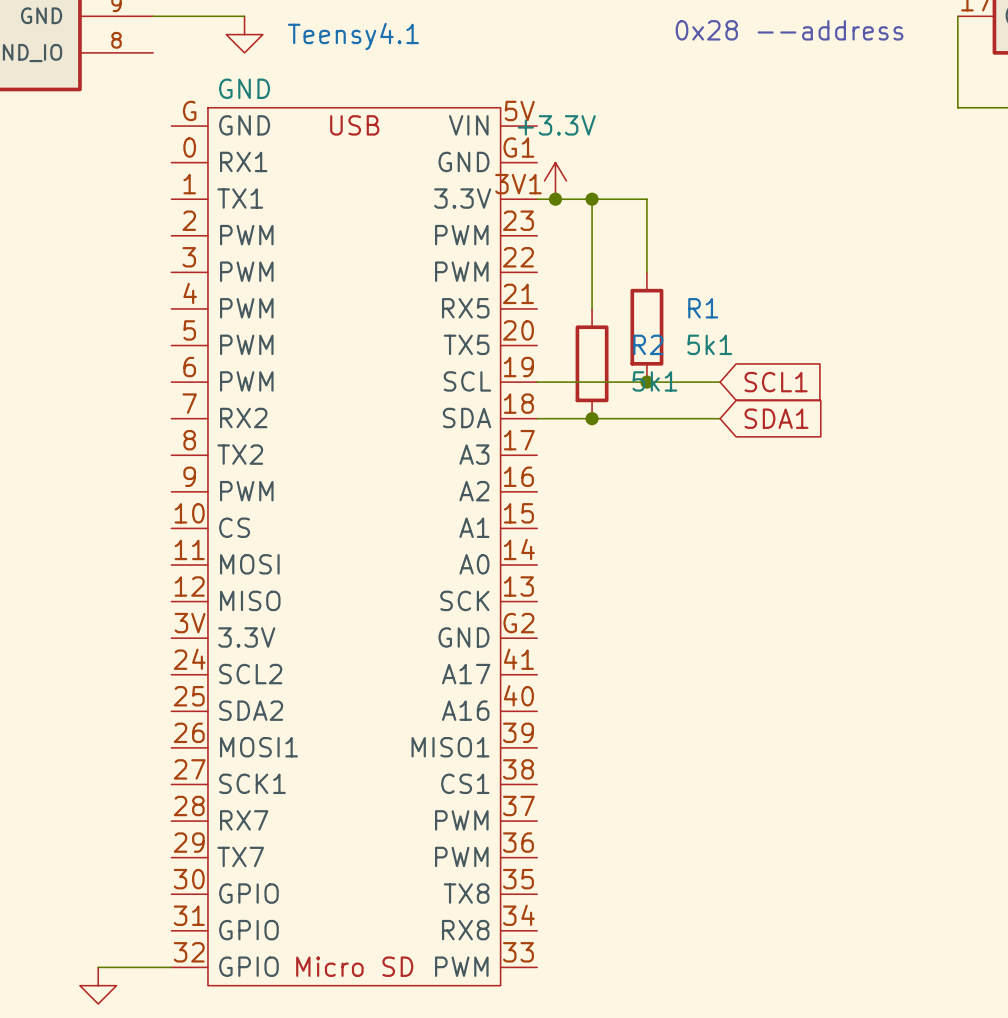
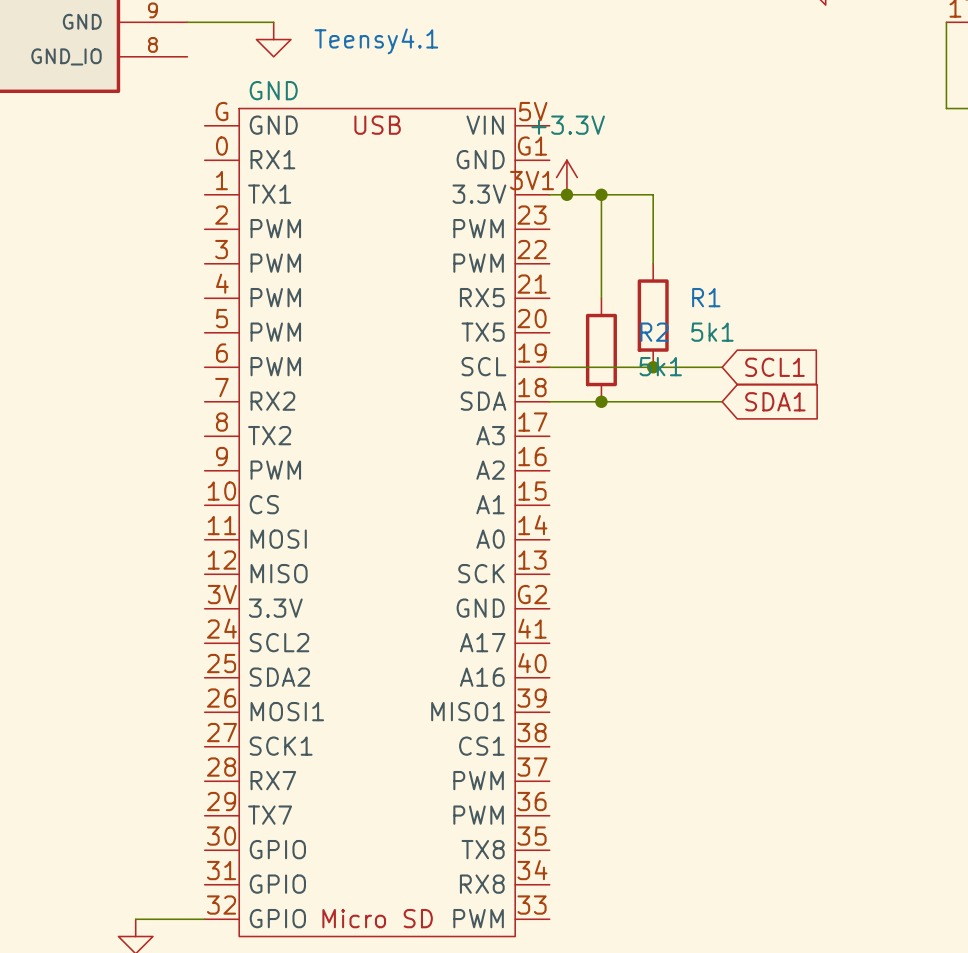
text: 0x28 --address (789, 30) -> none

